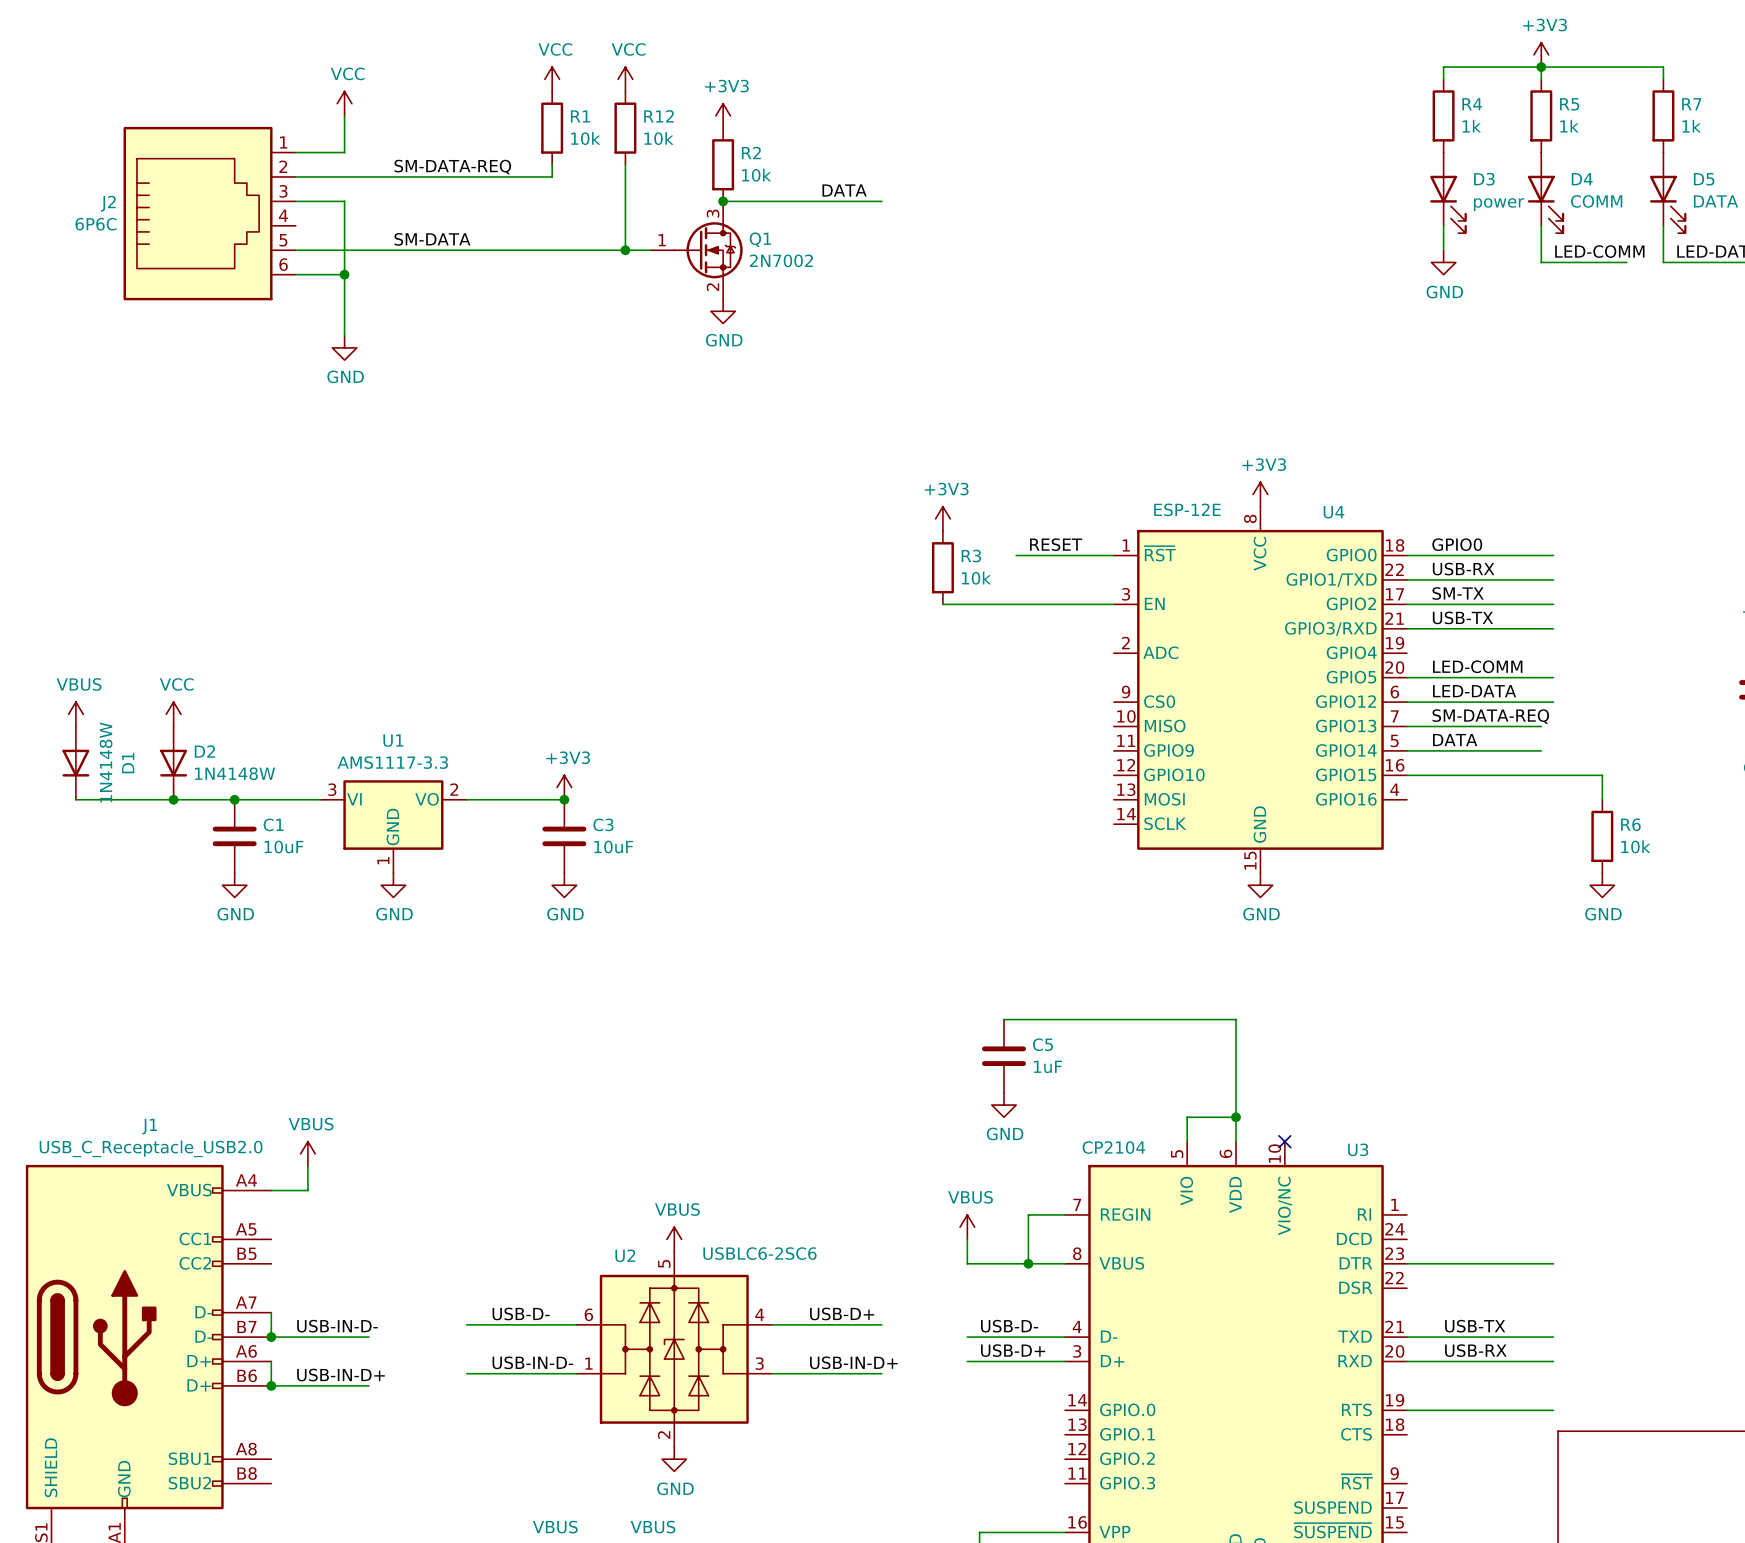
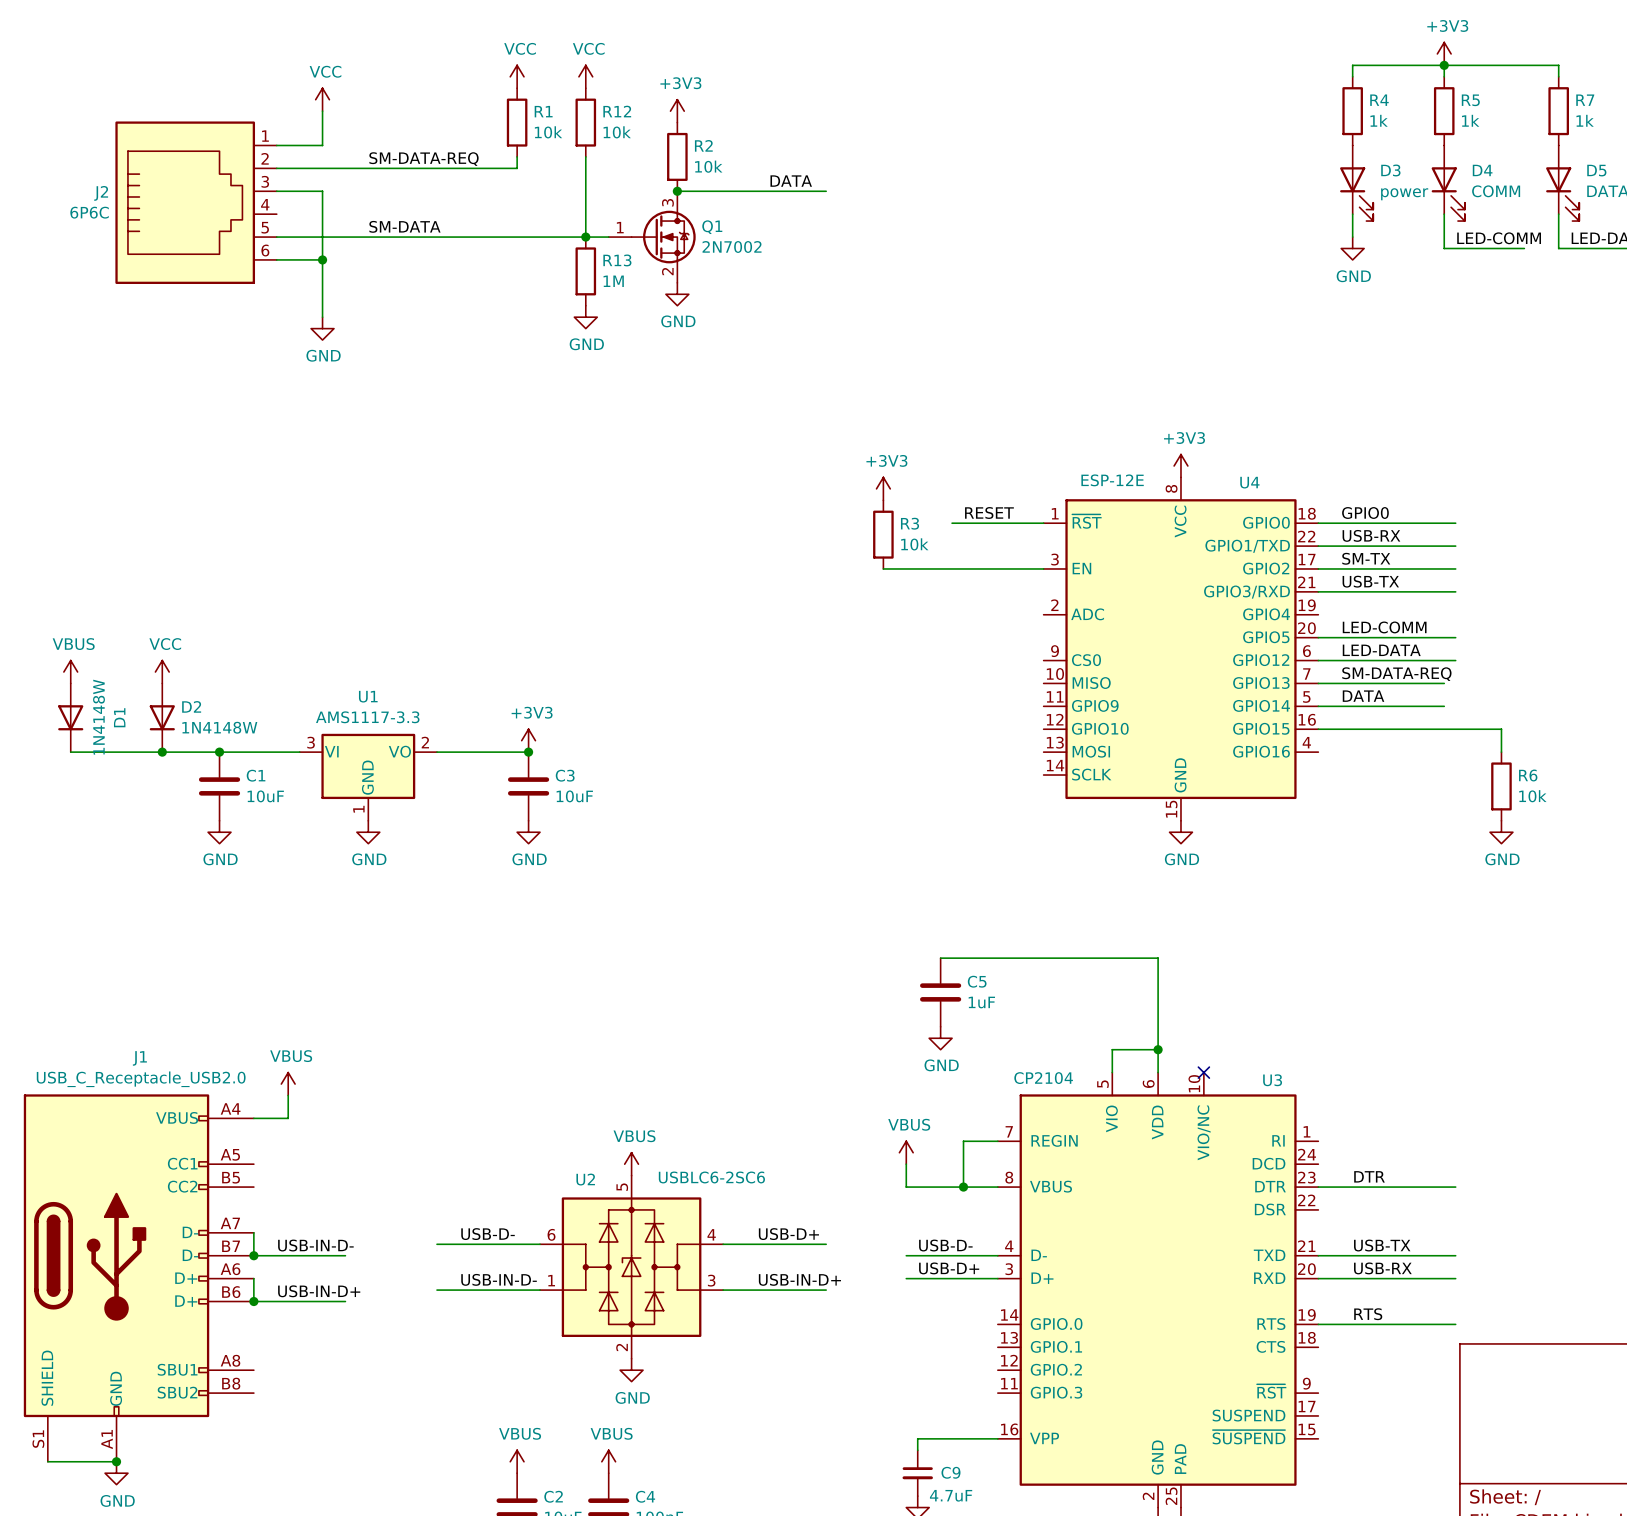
R13: none -> 1M (585, 271)
power symbol: none -> GND (585, 317)
label: none -> DTR (1369, 1176)
label: none -> RTS (1368, 1314)

